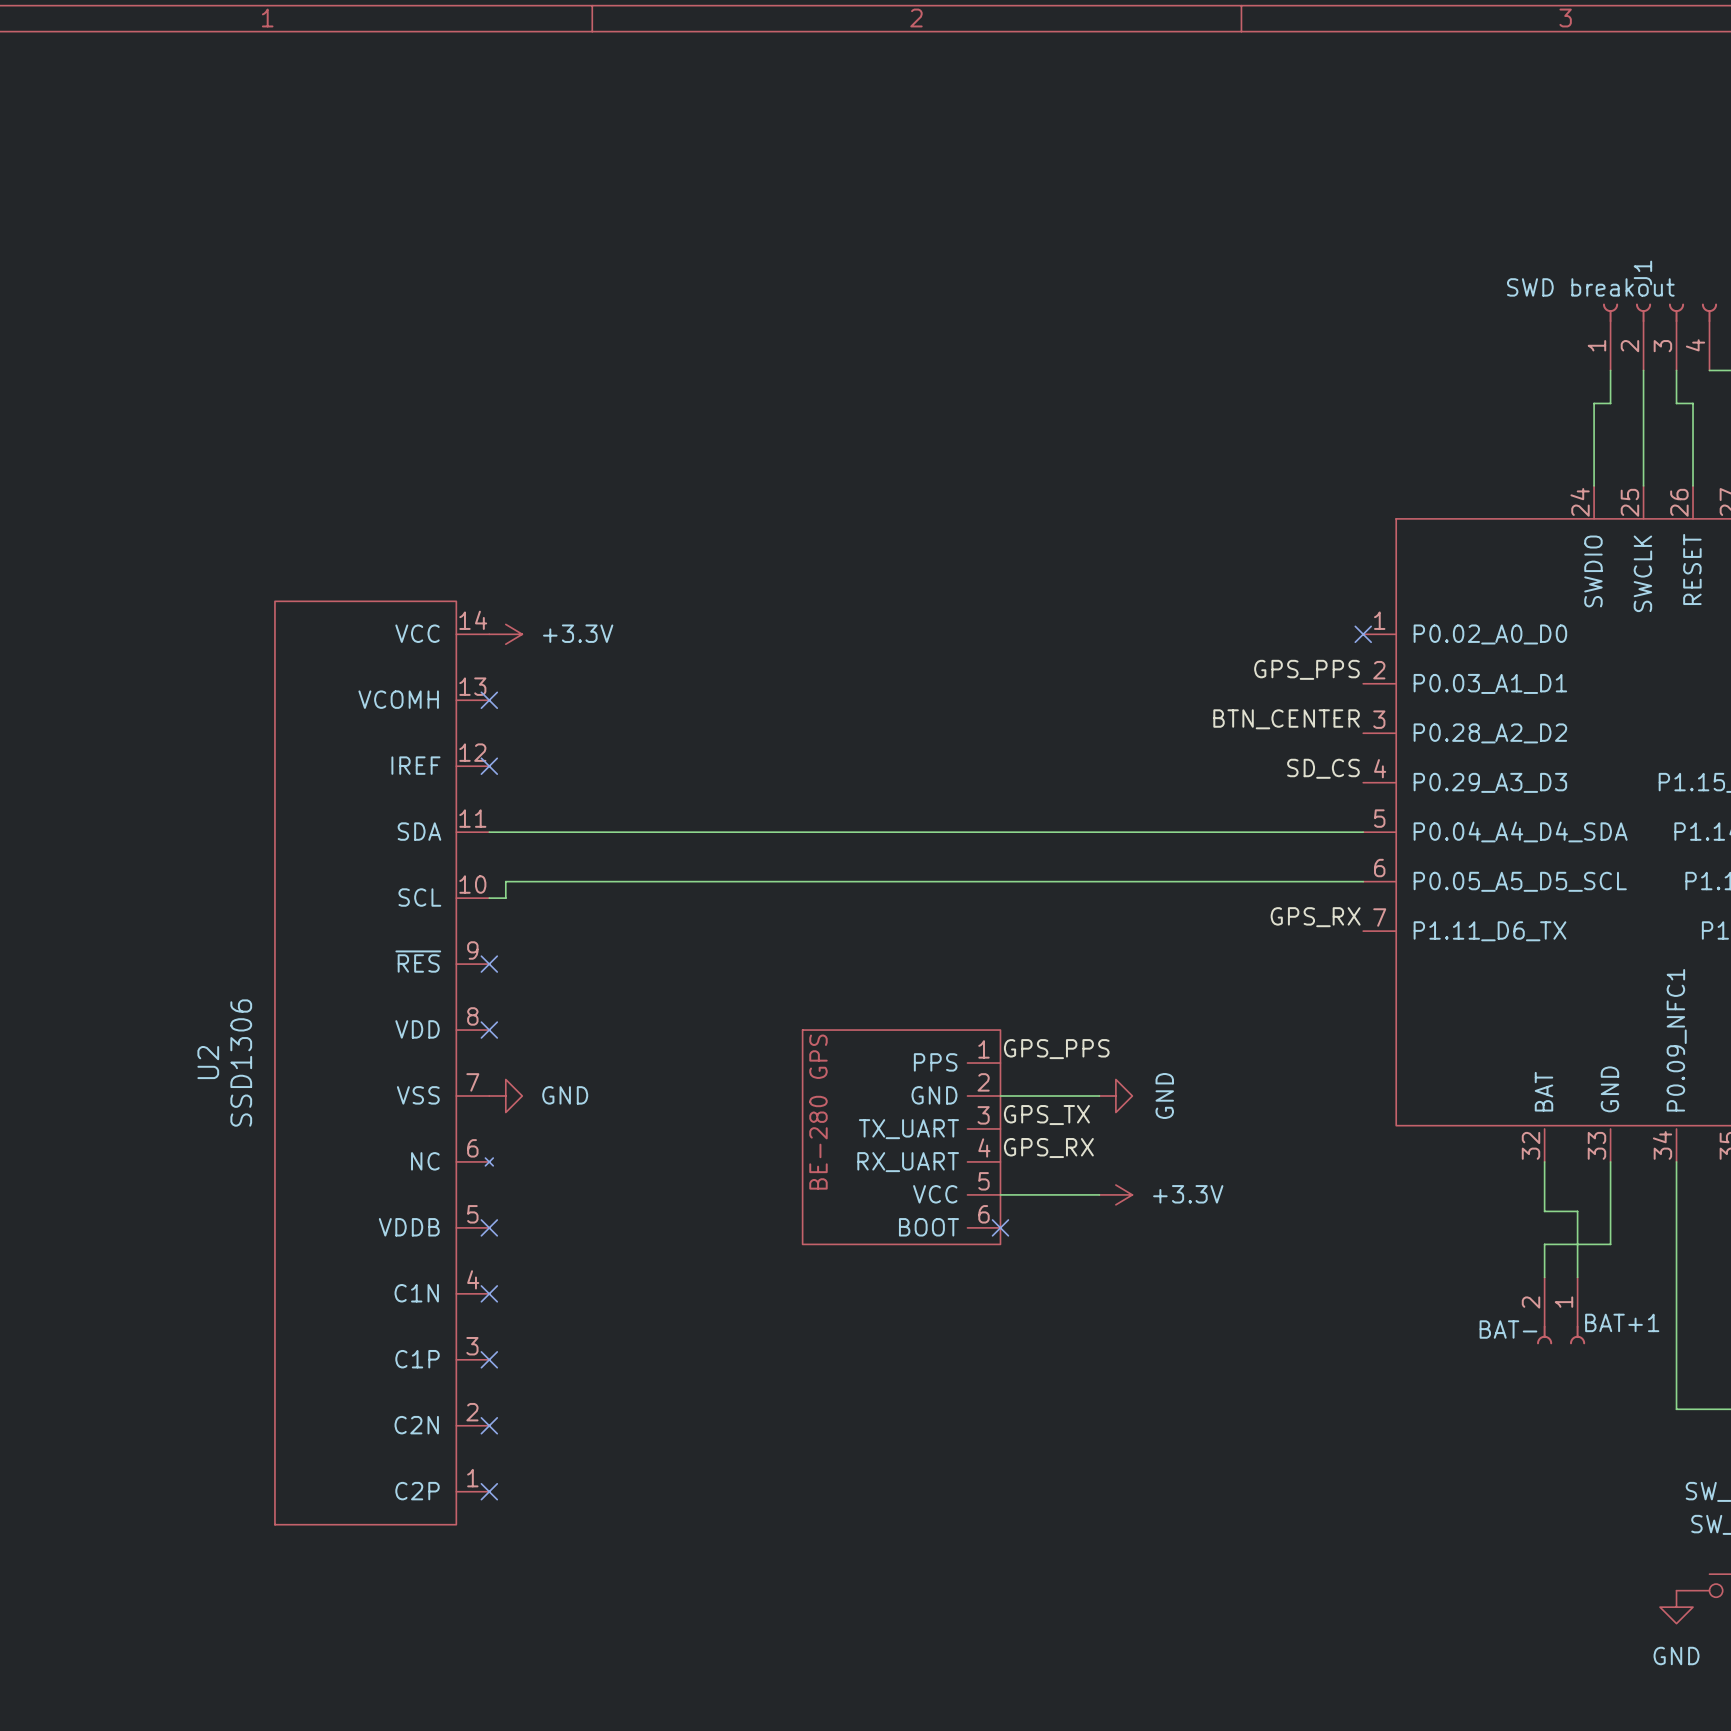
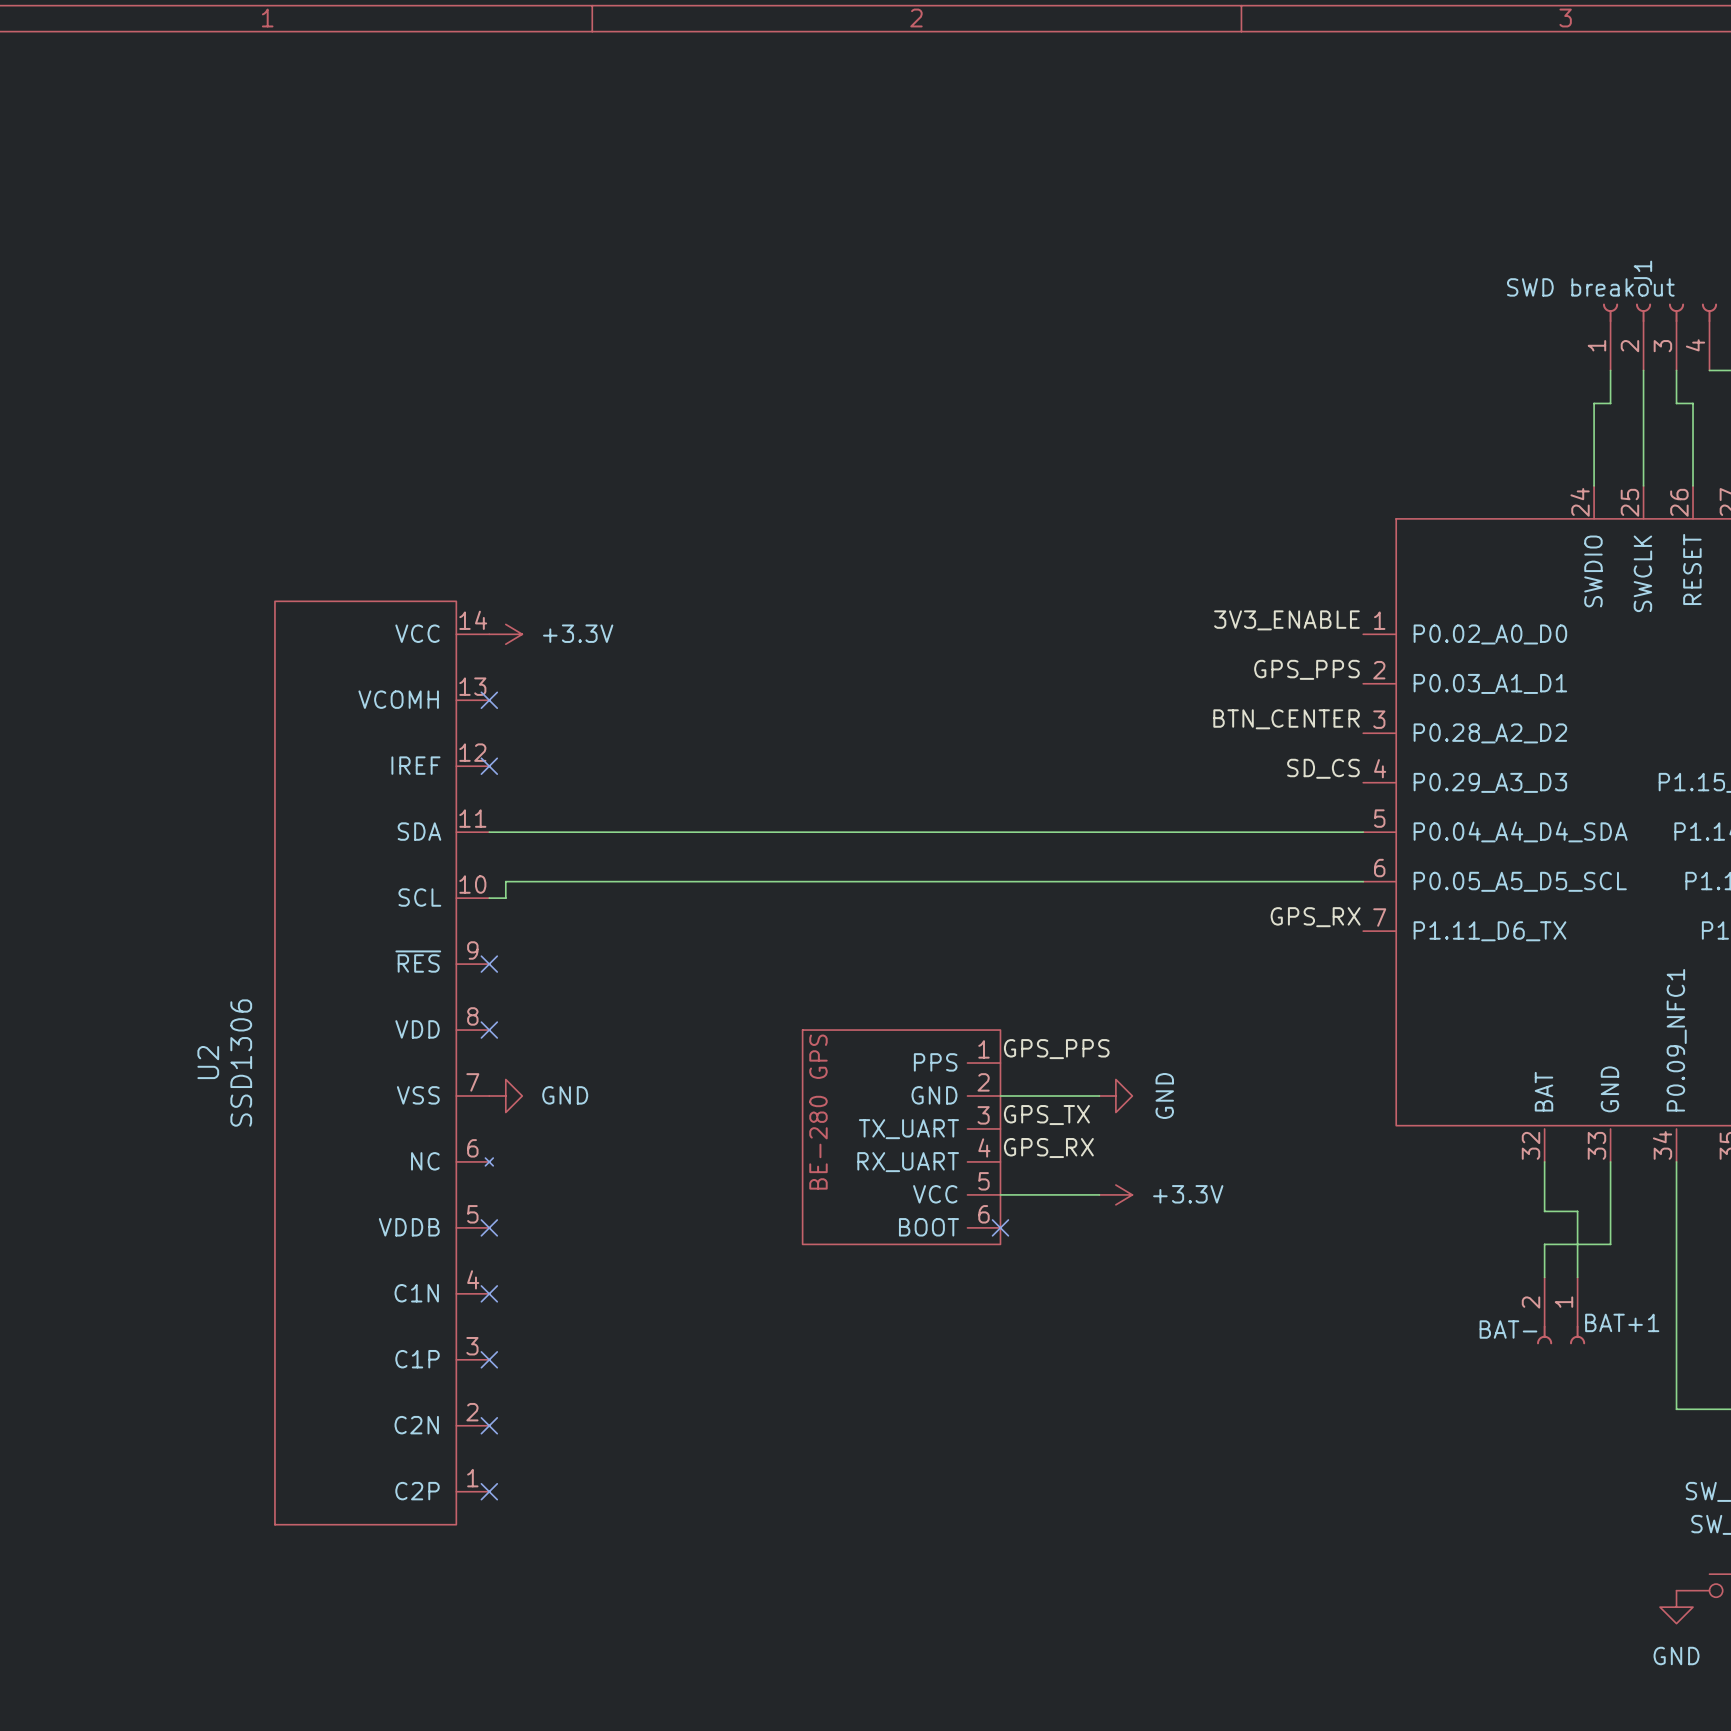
label: none -> 3V3_ENABLE (1286, 620)
no-connect mark: (1363, 634) -> none

